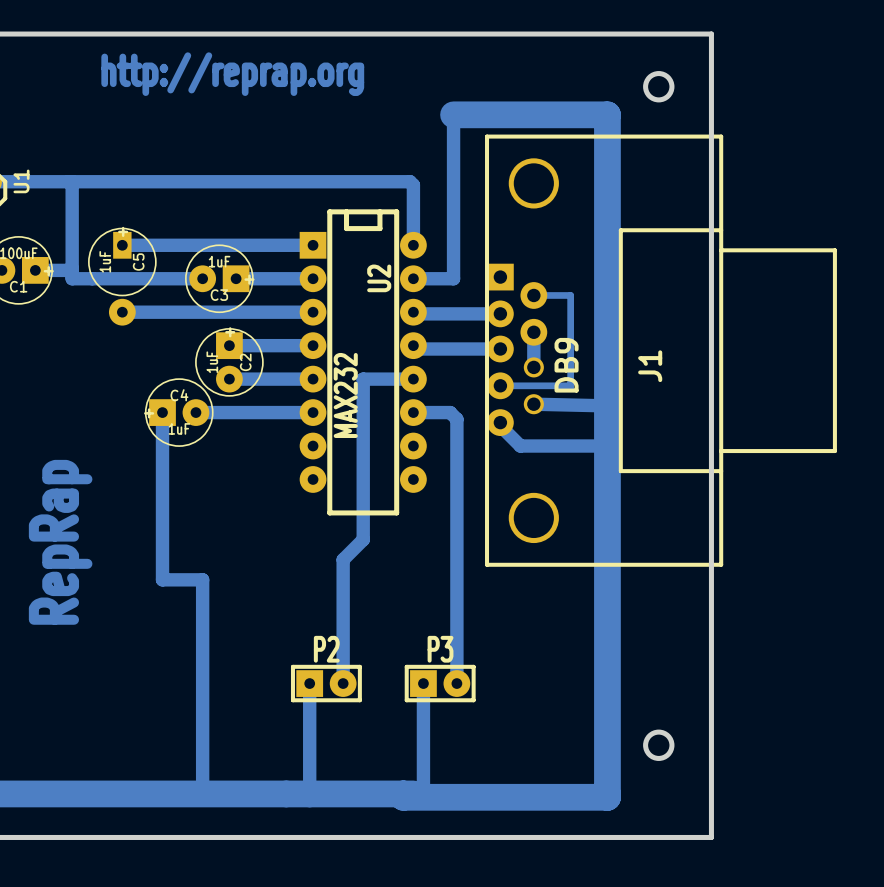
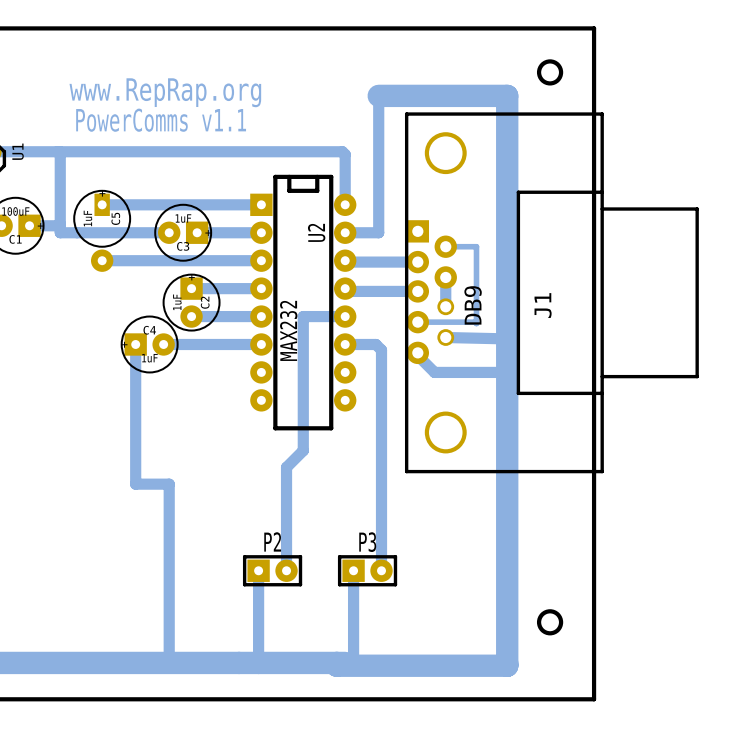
text: http://reprap.org (232, 74) -> none
text: none -> www.RepRap.org (165, 92)
text: none -> PowerComms v1.1 (161, 120)
text: RepRap (60, 542) -> none

